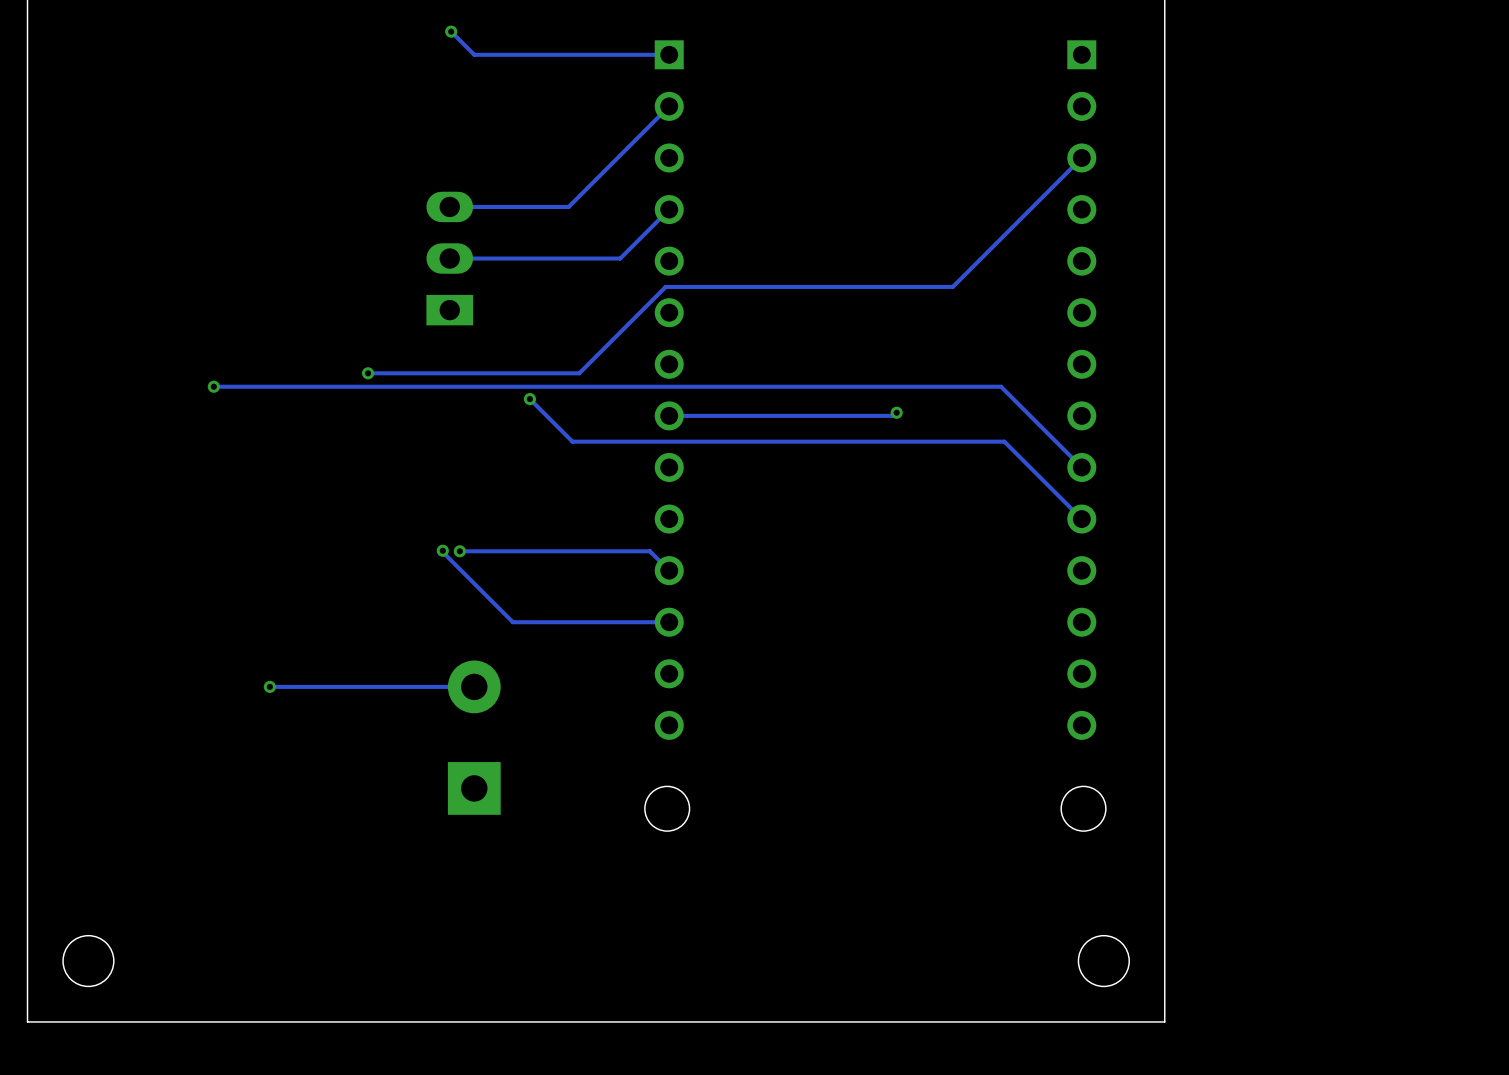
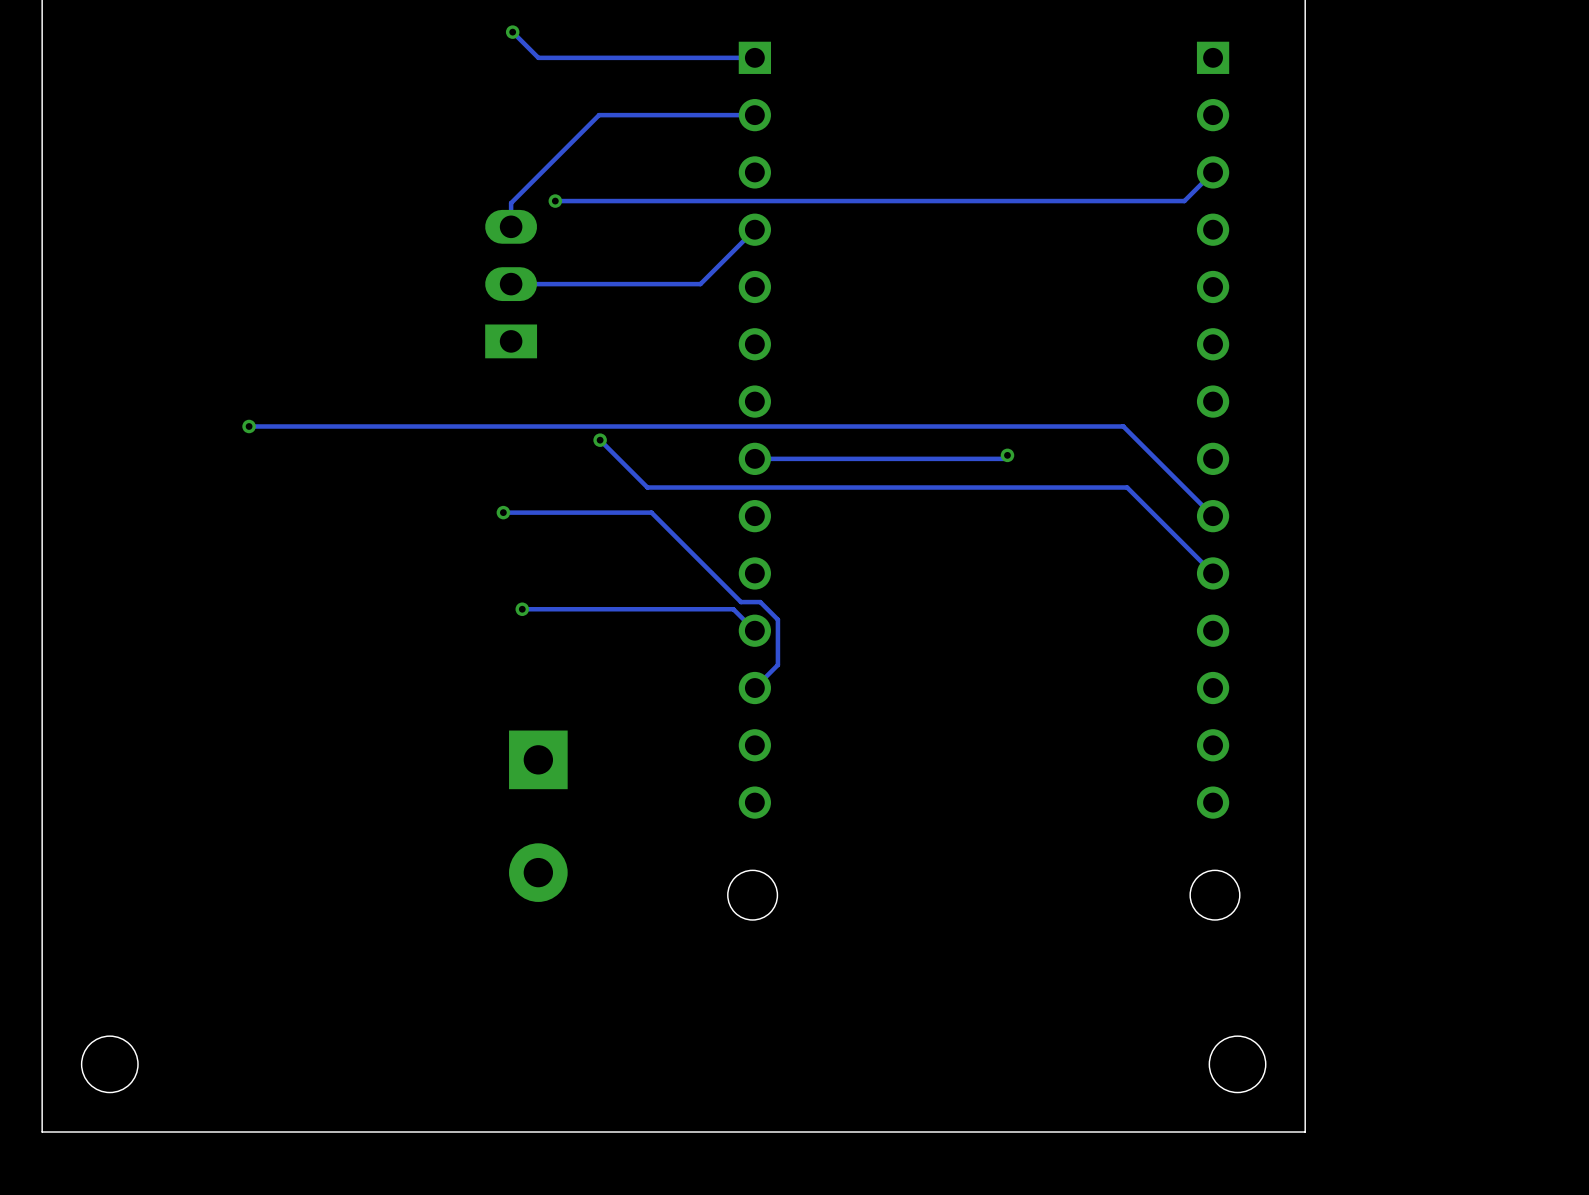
track: (669, 106) (568, 206) (449, 206) -> (754, 115) (599, 115) (511, 203) (511, 226)
via: none -> (555, 201)
track: (1056, 183) (952, 286) (665, 286) (579, 373) (368, 373) -> (1184, 201) (555, 201)
via: (368, 373) -> none
via: none -> (503, 512)
track: (442, 550) (512, 622) (669, 622) -> (503, 512) (651, 512) (741, 602) (760, 602) (777, 619) (777, 664) (754, 688)
via: (442, 550) -> none
via: (269, 686) -> none
track: (474, 686) (269, 686) -> none
part rotation: 0° (474, 737) -> 180° (538, 816)

